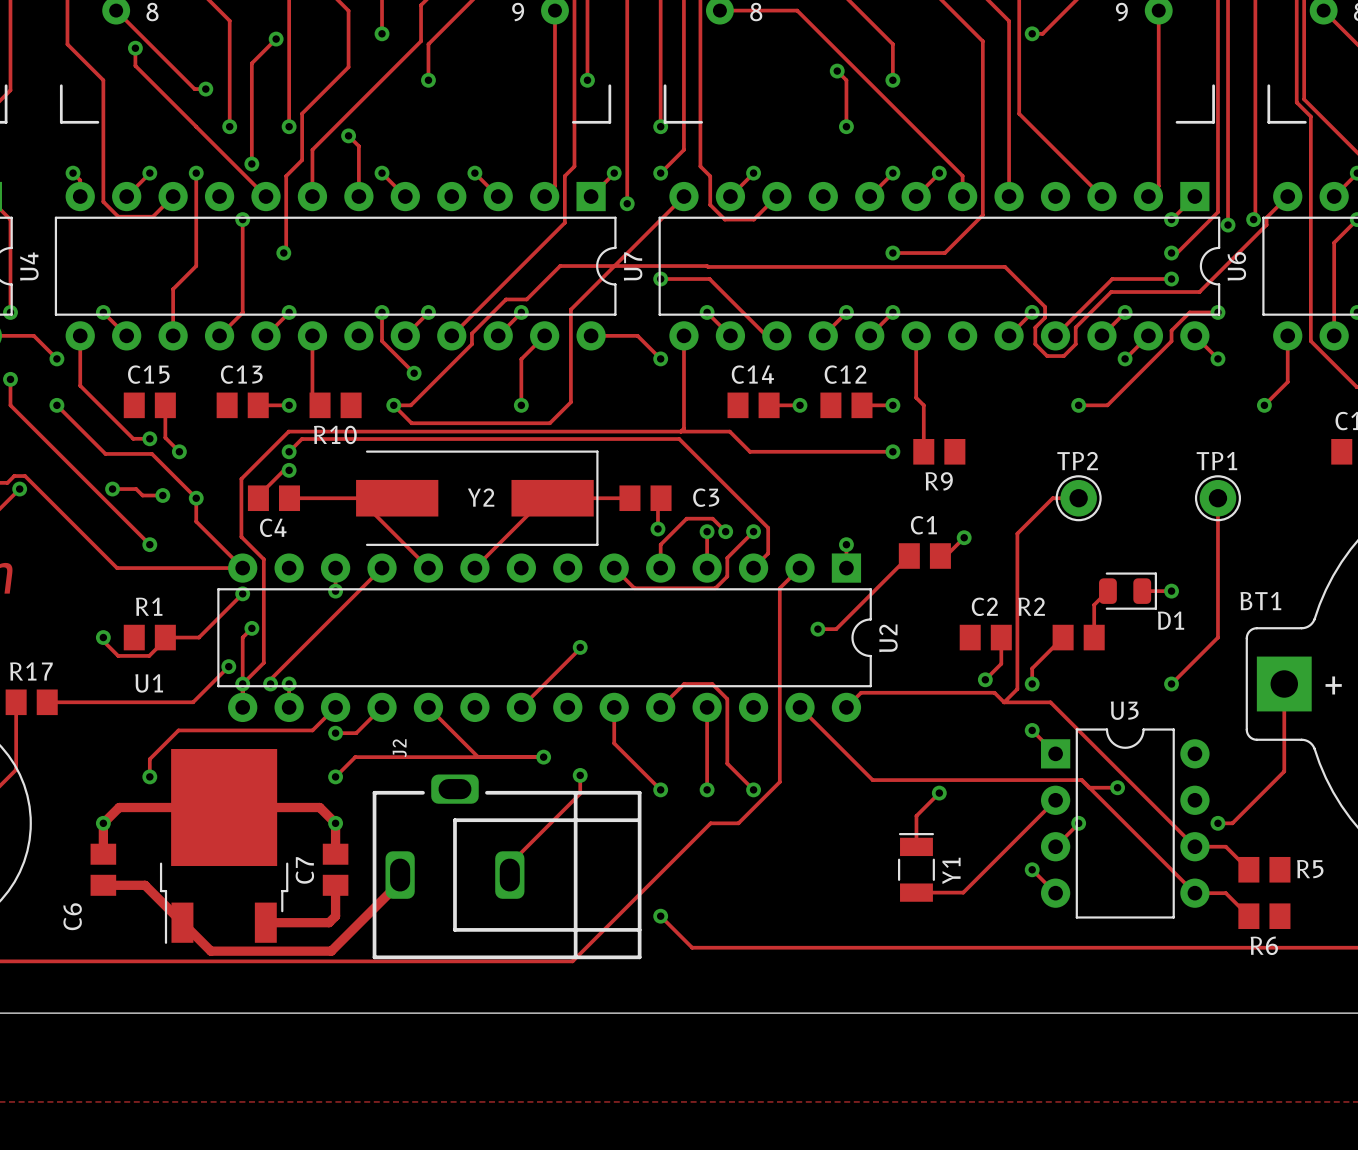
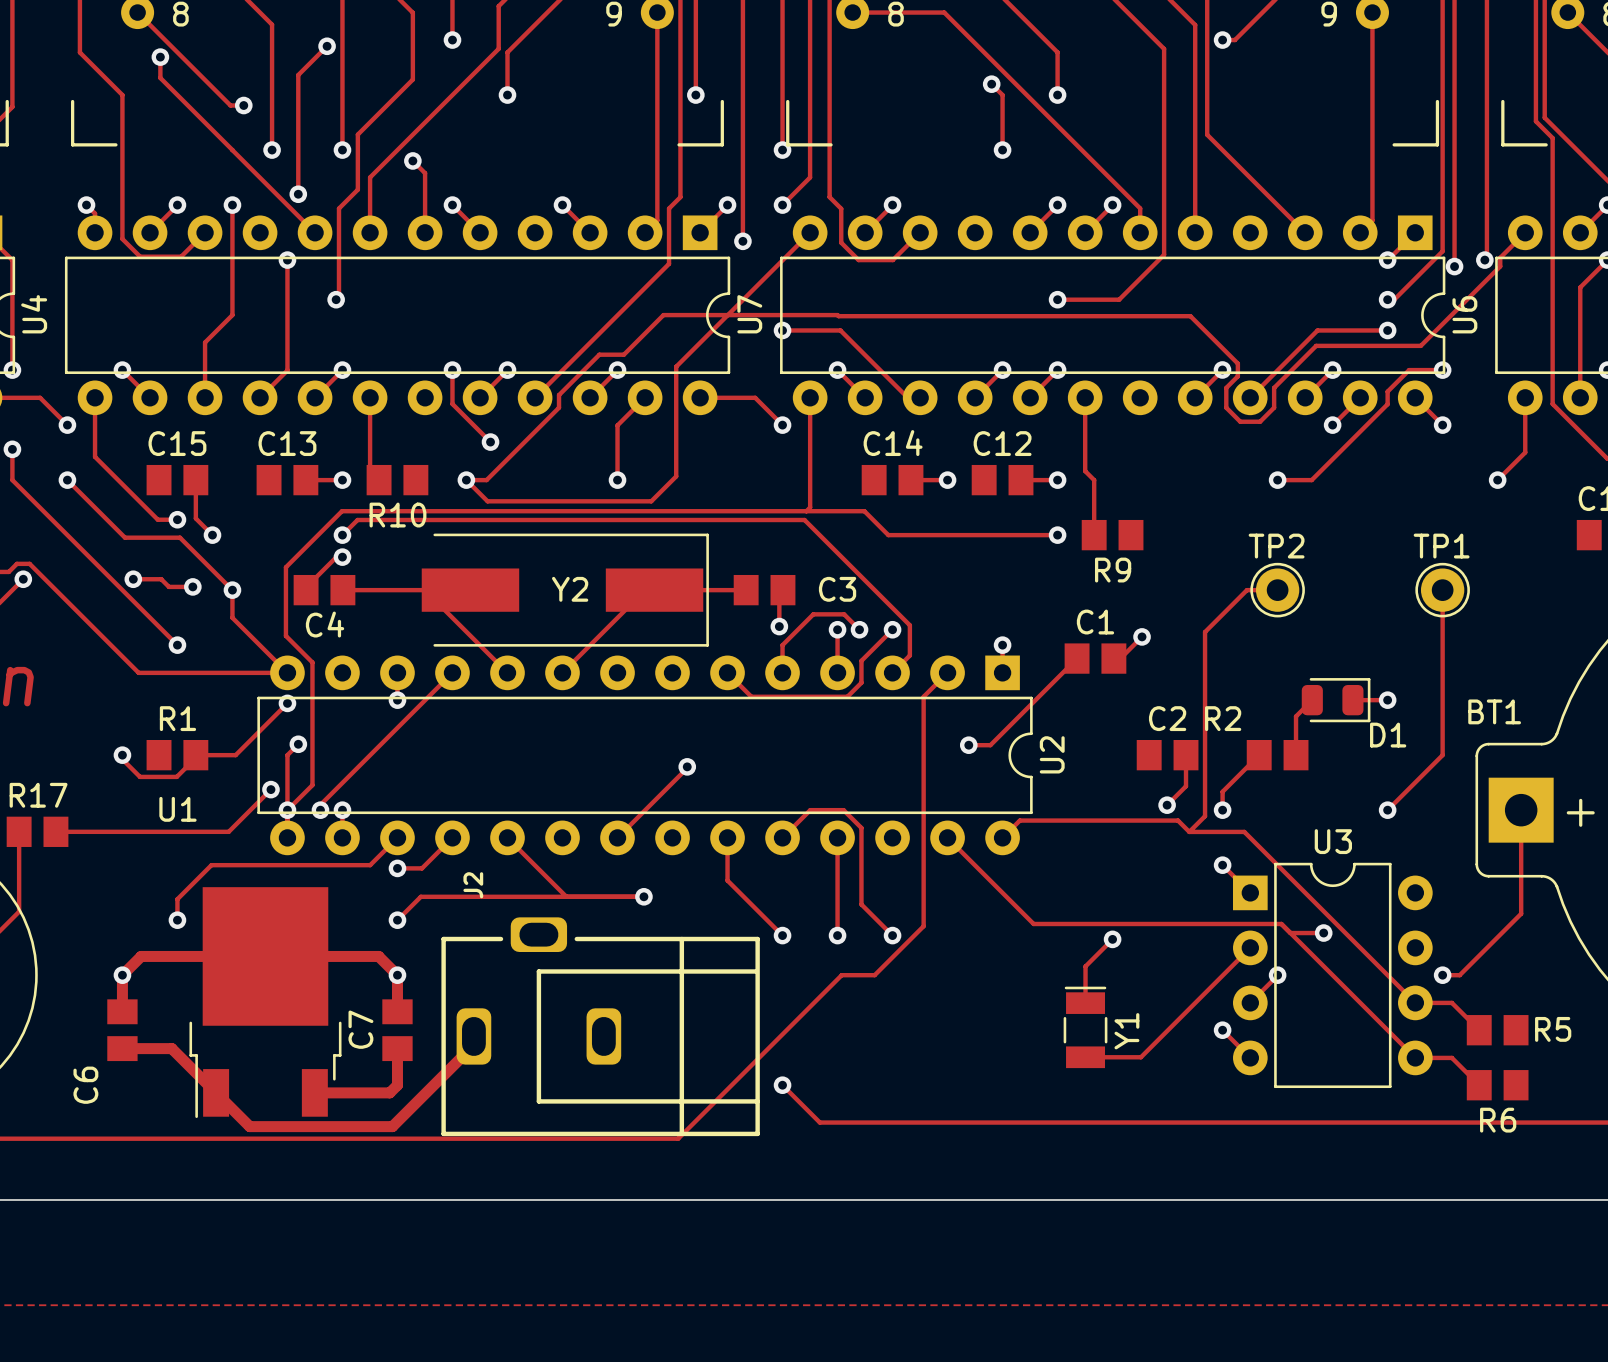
track: (580, 775) (580, 793) (507, 866) -> none
via: (580, 775) -> none

